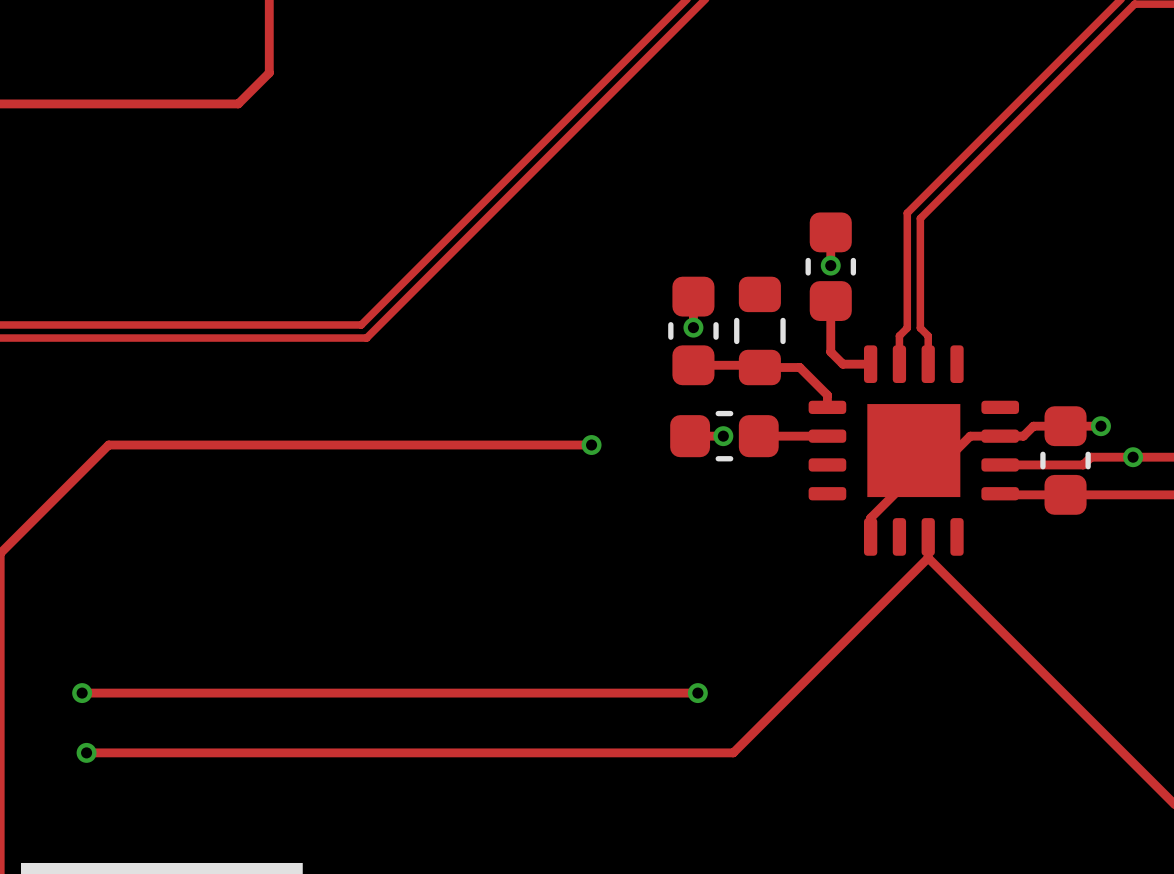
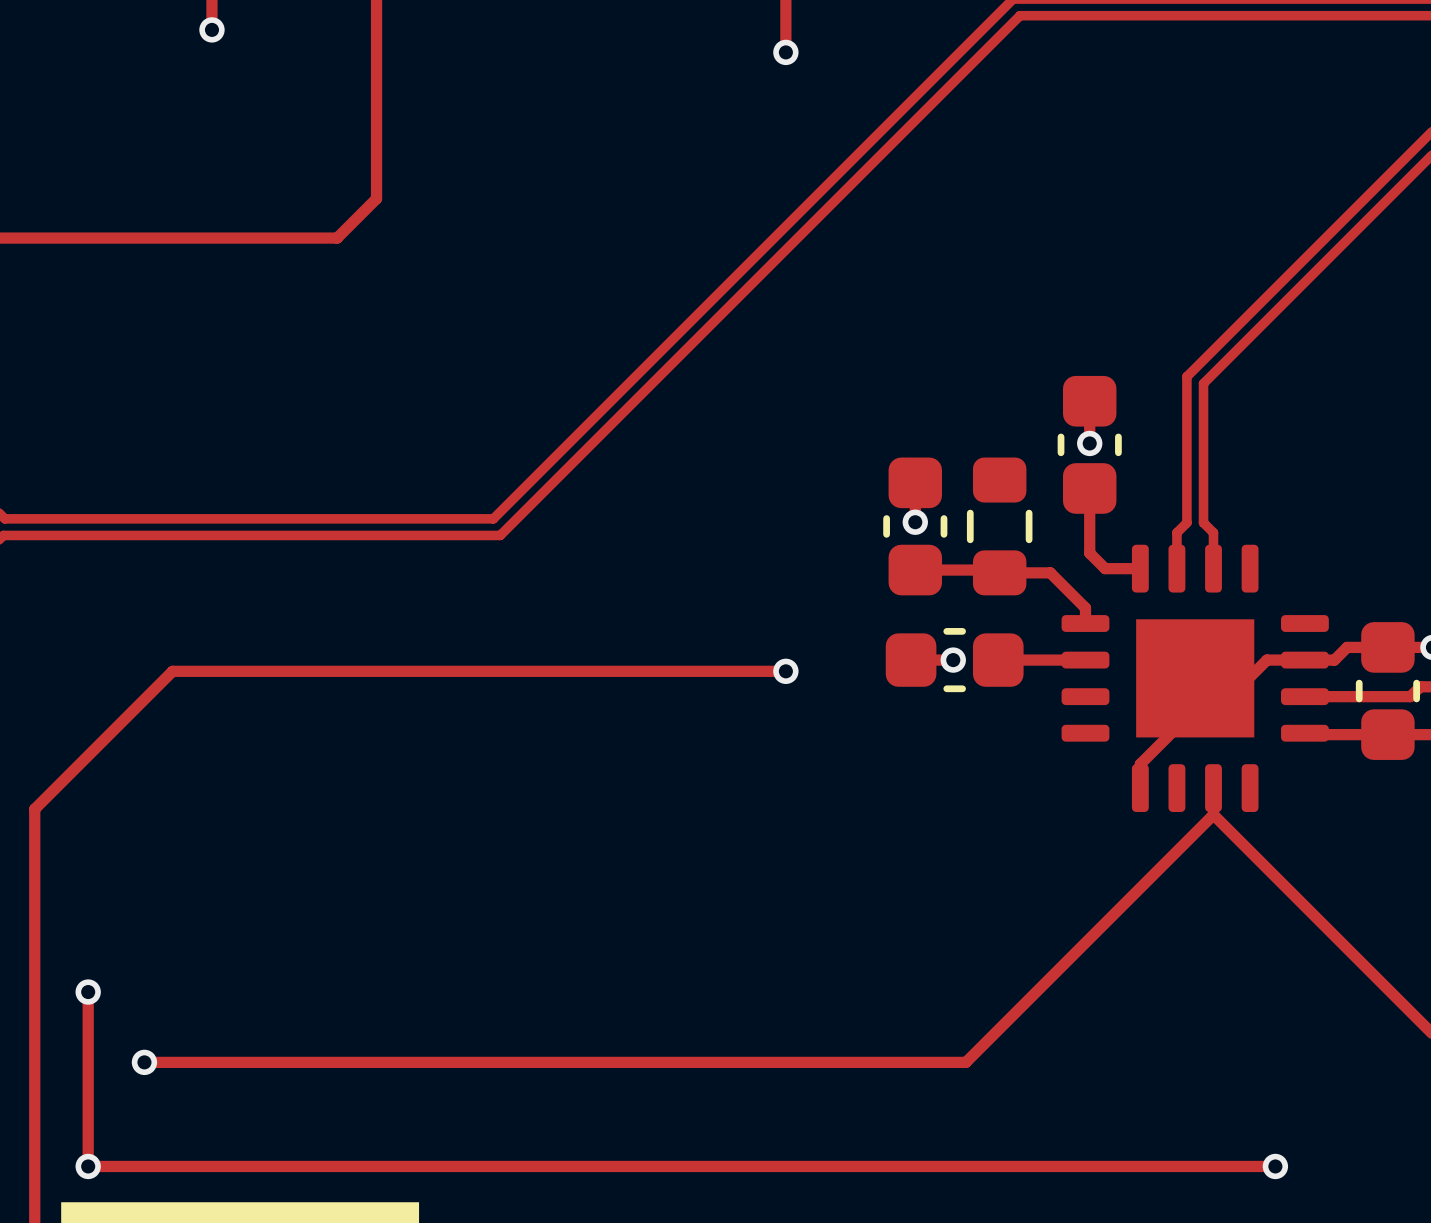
track: (82, 693) (697, 693) -> none
via position: (82, 693) -> (88, 992)
via: (697, 693) -> none
track: none -> (88, 992) (88, 1166) (1275, 1166)
via: none -> (88, 1166)
via: none -> (1275, 1166)

